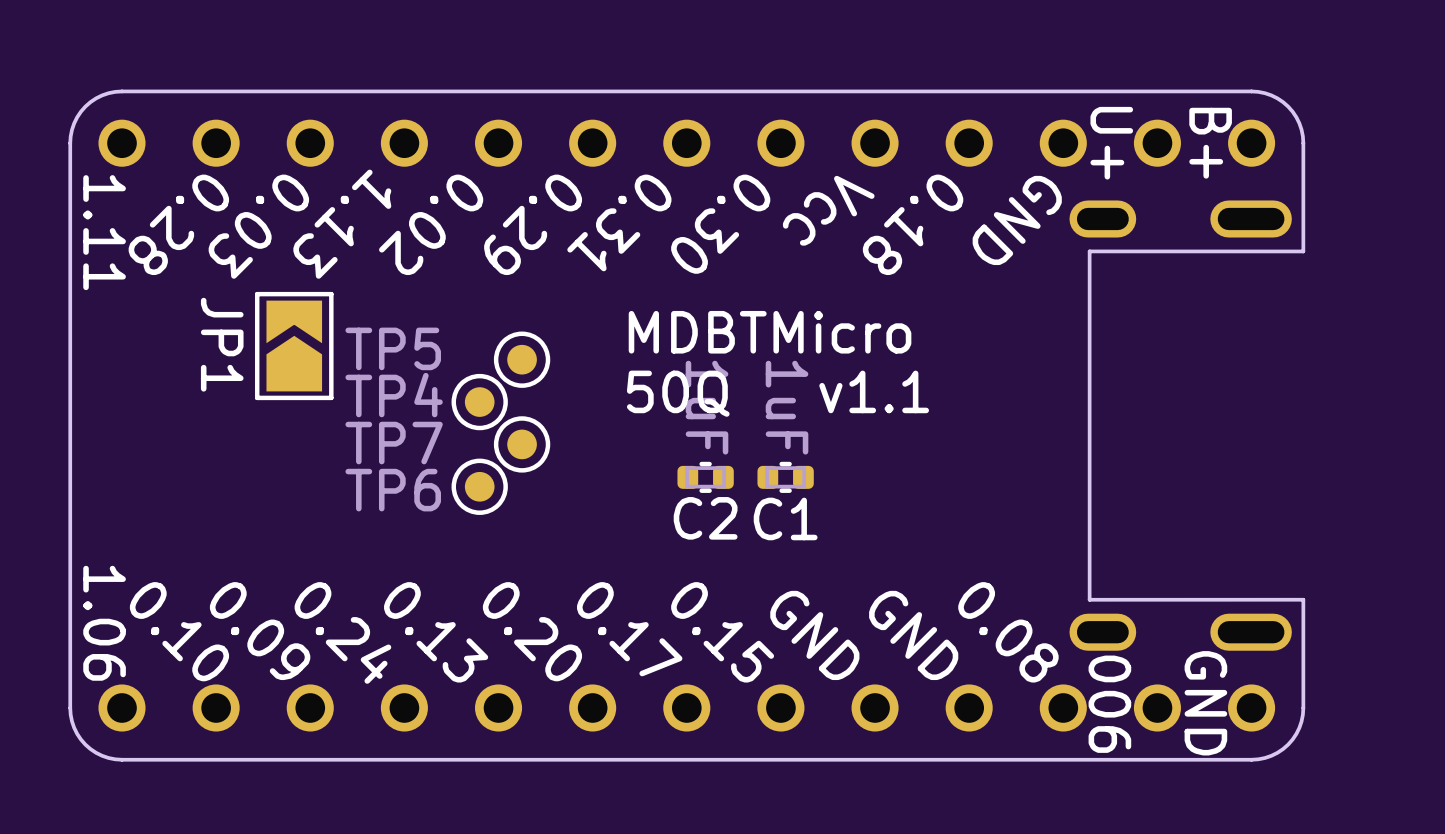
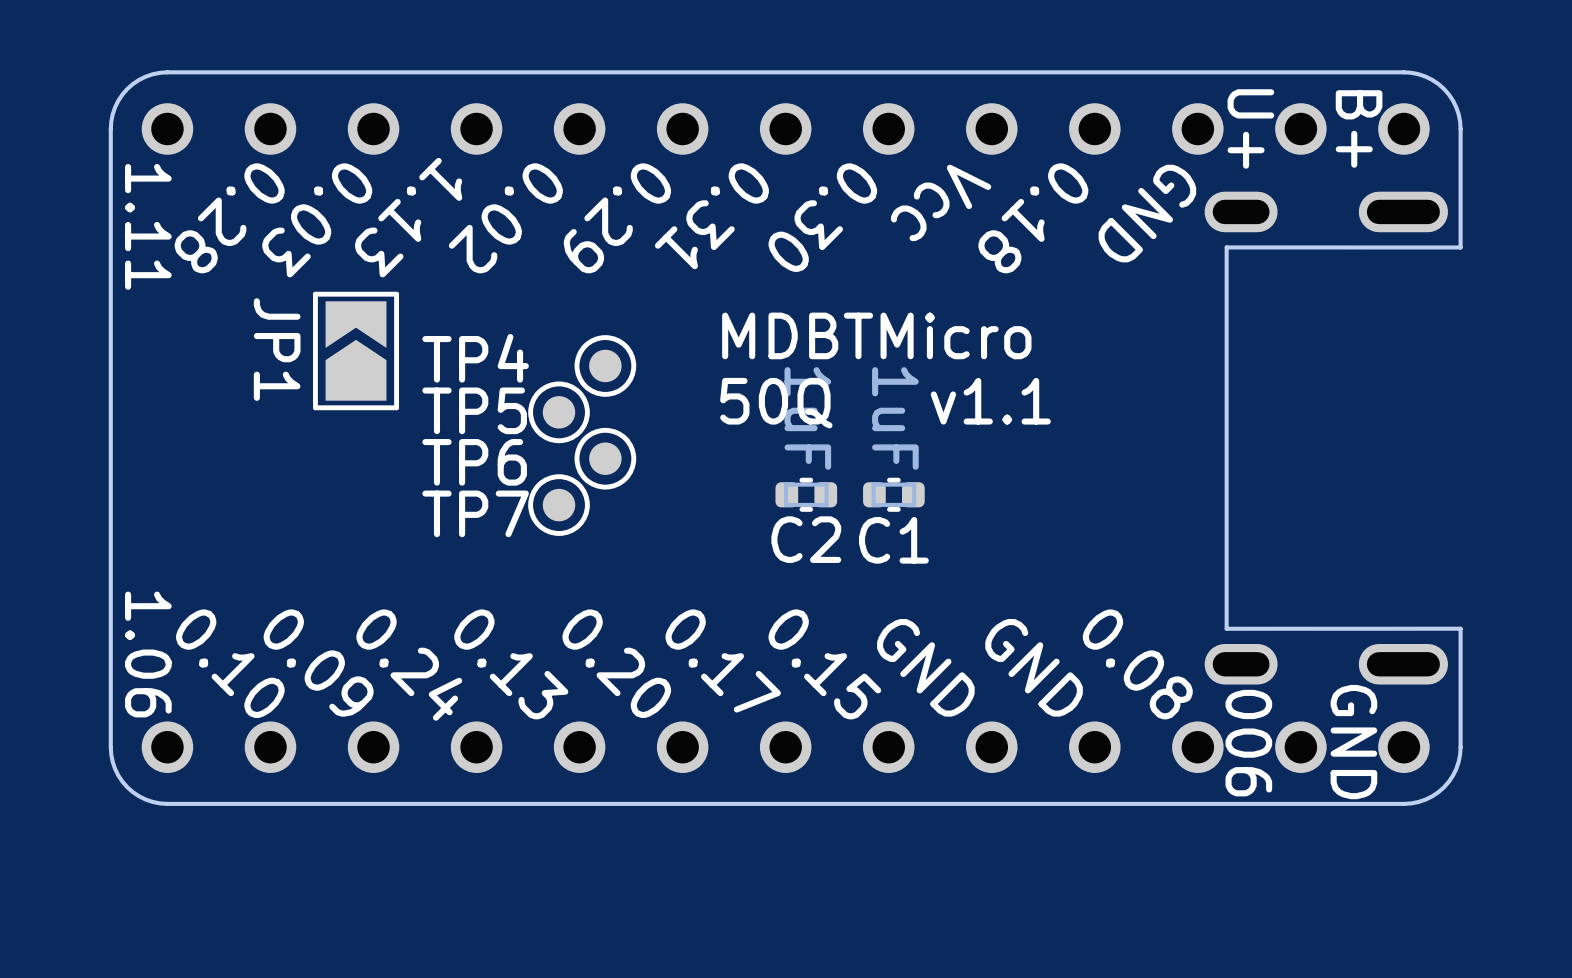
TP5 name: TP5 (393, 348) -> TP4 (475, 358)
TP4 name: TP4 (394, 395) -> TP5 (474, 410)
TP7 name: TP7 (394, 443) -> TP6 (474, 462)
TP6 name: TP6 (393, 490) -> TP7 (475, 513)

